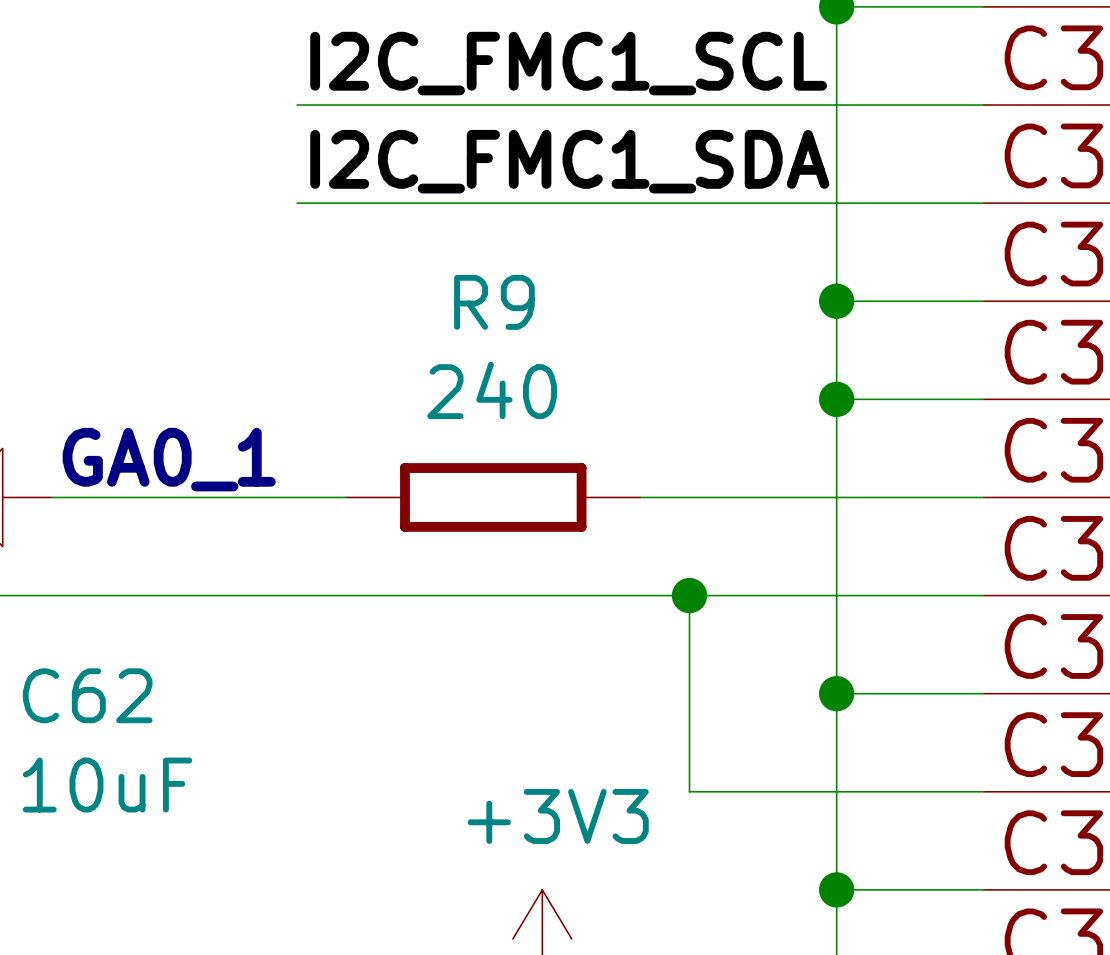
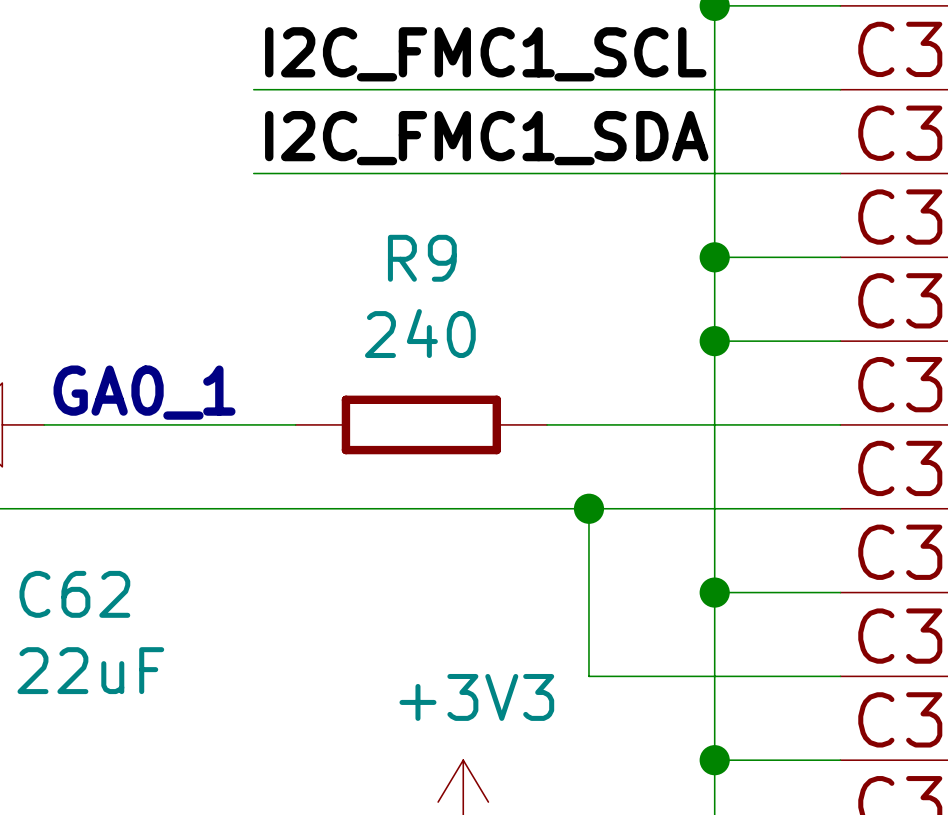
C62 text: 10uF (107, 785) -> 22uF (90, 670)

